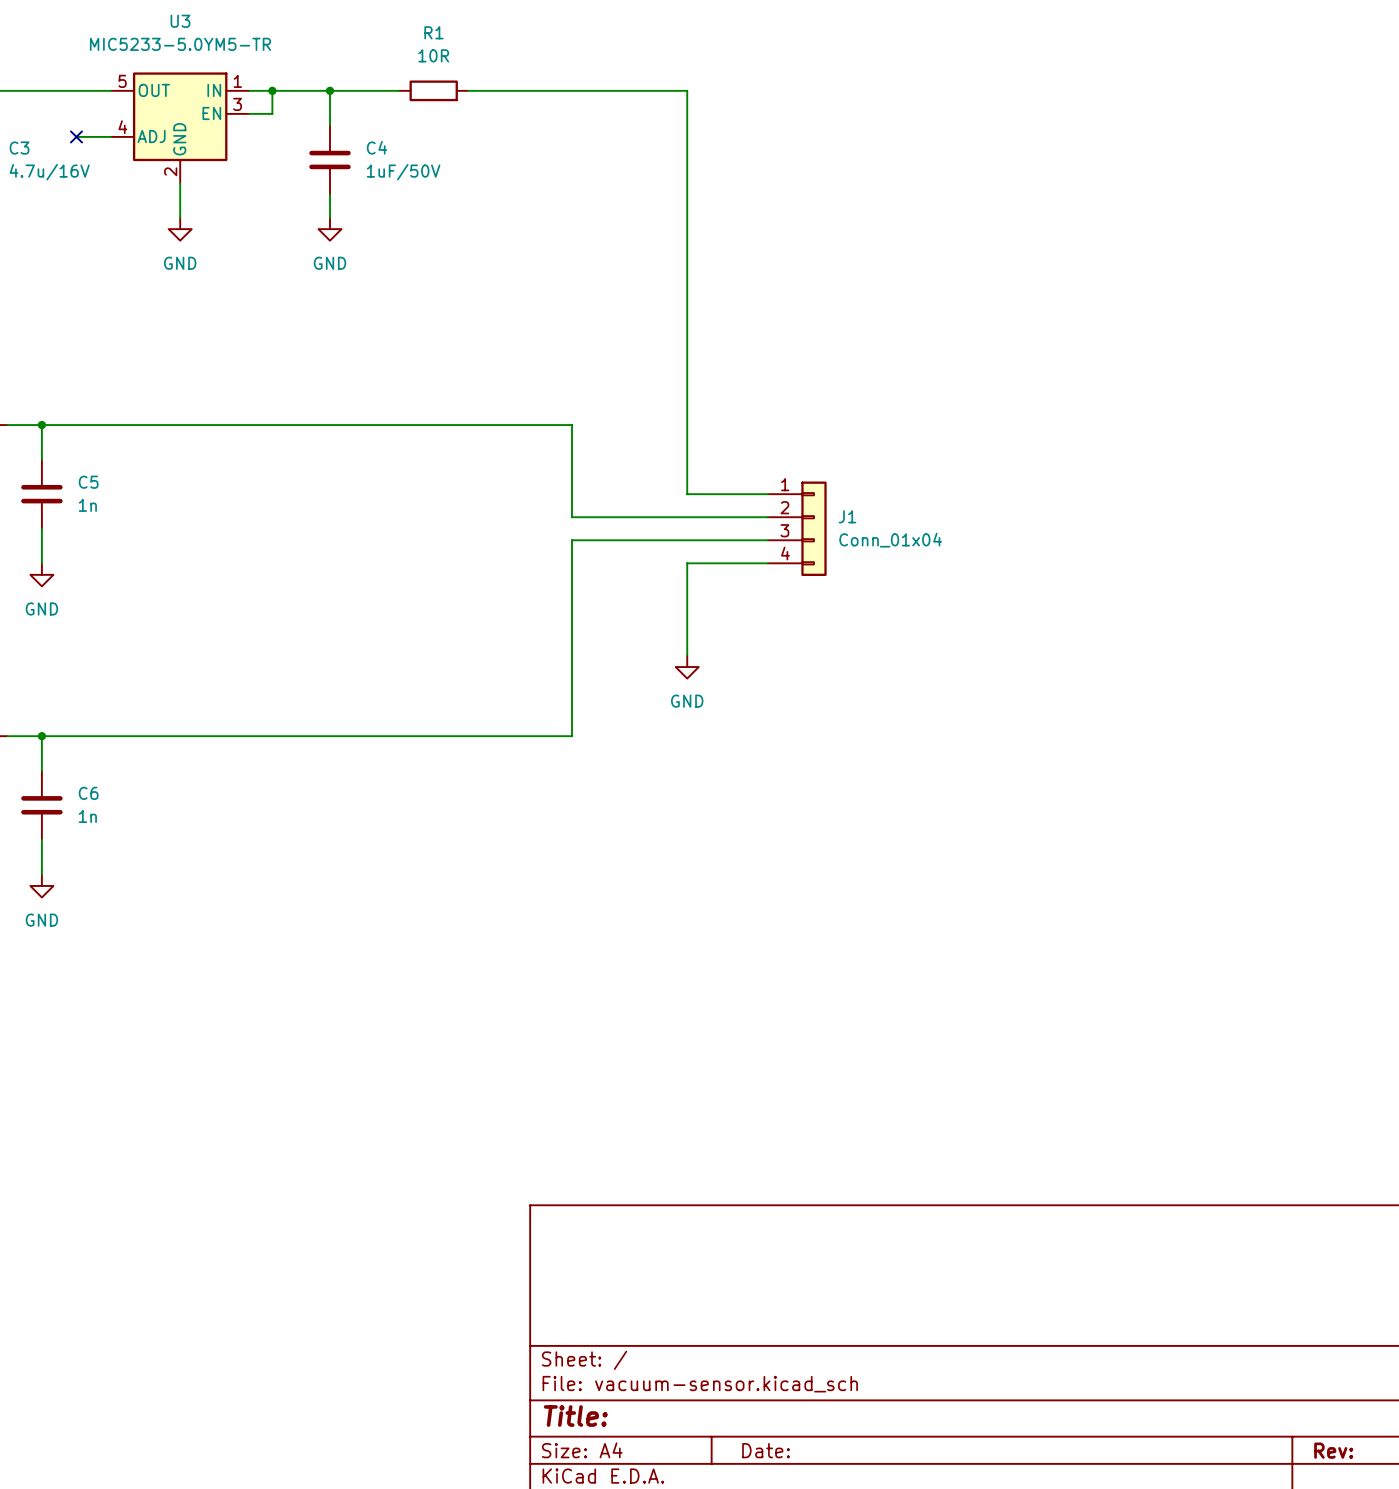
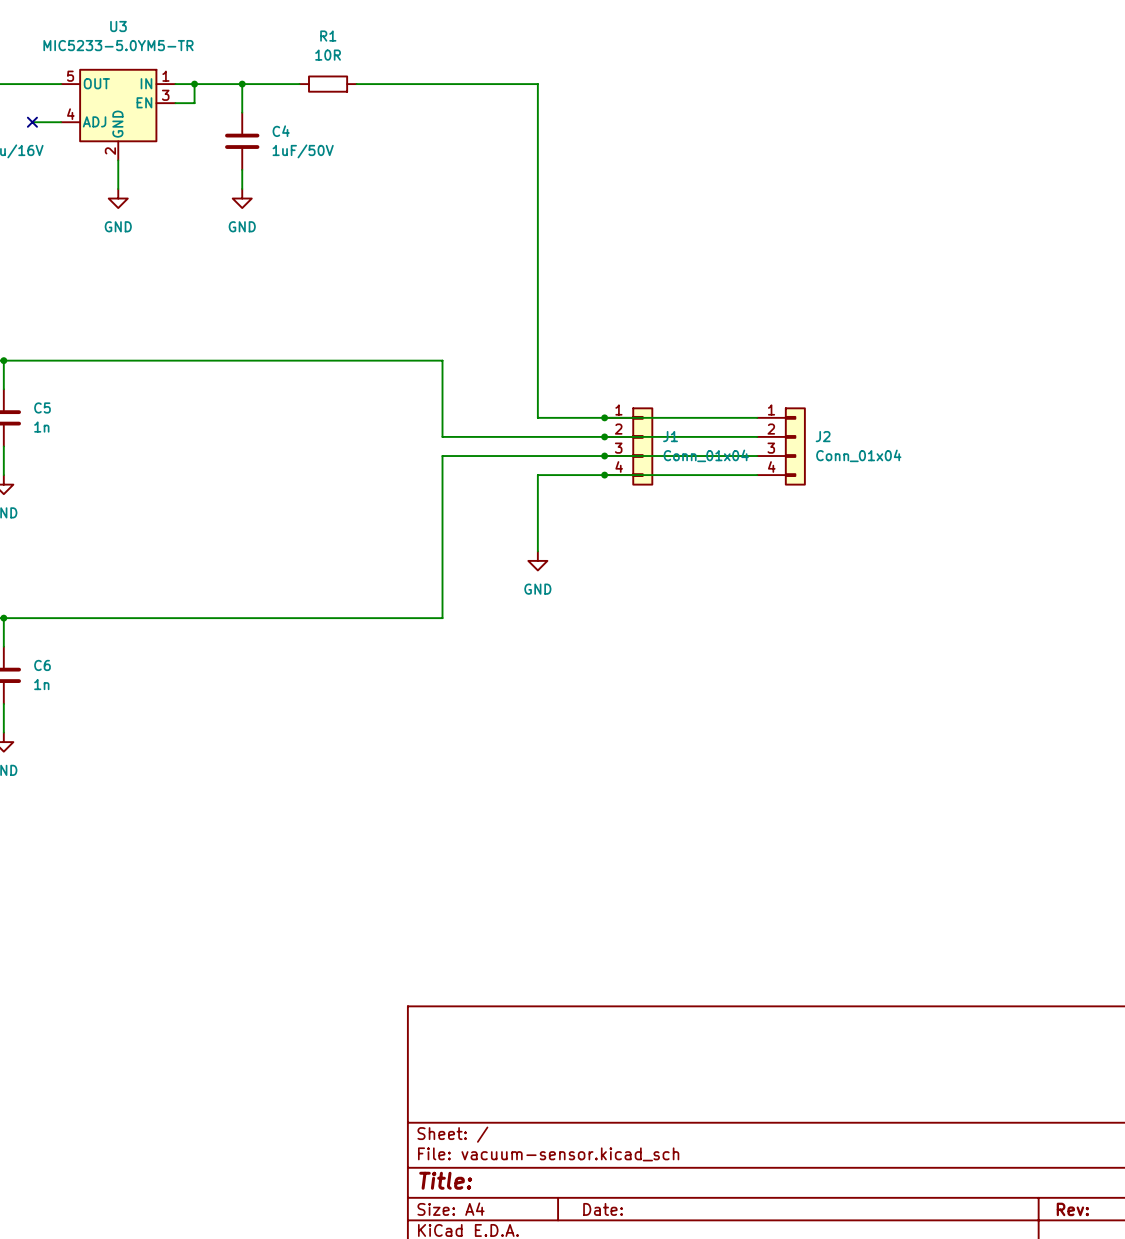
wire: none -> (604, 417) (757, 417)
junction: none -> (604, 417)
wire: none -> (604, 436) (757, 436)
junction: none -> (604, 436)
J2: none -> Conn_01x04 (781, 446)
wire: none -> (604, 456) (757, 456)
junction: none -> (604, 456)
wire: none -> (604, 475) (757, 475)
junction: none -> (604, 475)

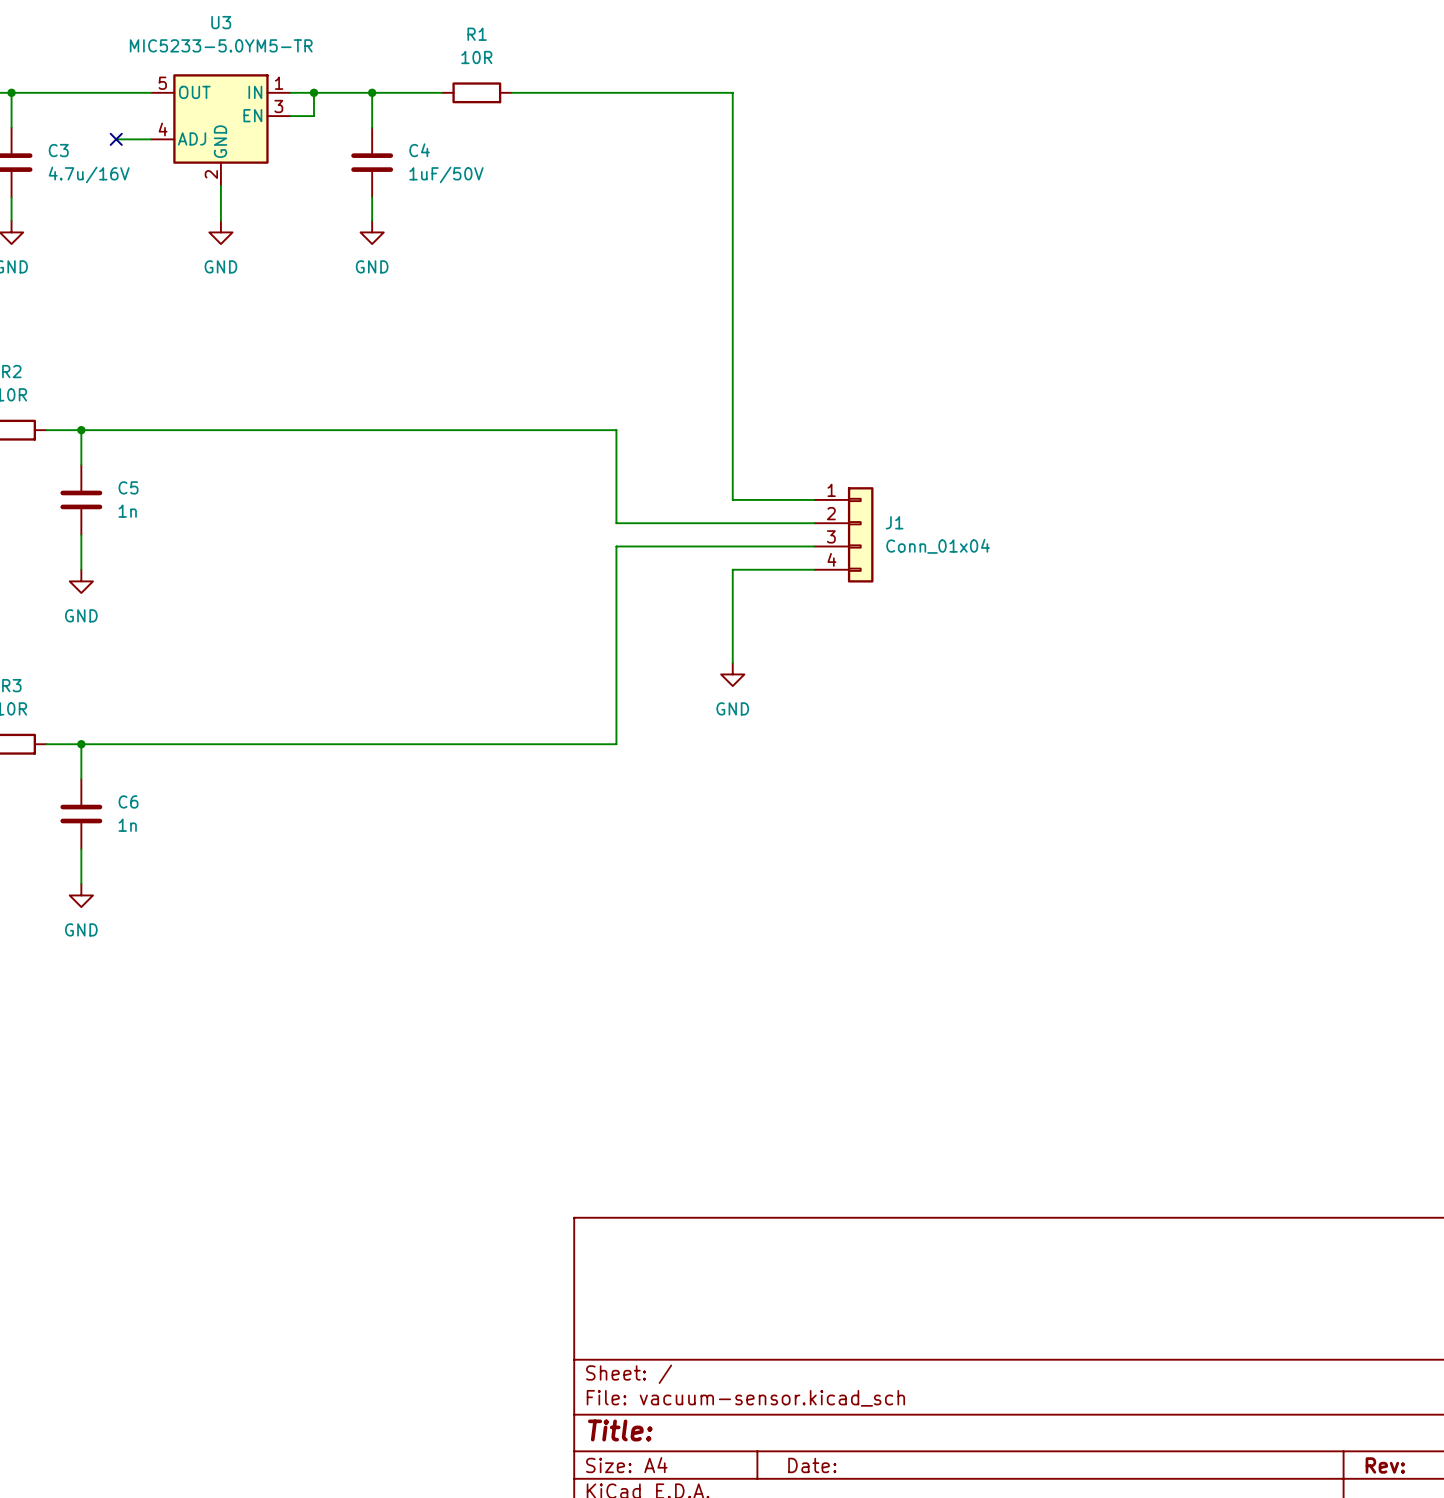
wire: (604, 417) (757, 417) -> none
junction: (604, 417) -> none
wire: (604, 436) (757, 436) -> none
junction: (604, 436) -> none
J2: Conn_01x04 (781, 446) -> none
wire: (604, 456) (757, 456) -> none
junction: (604, 456) -> none
wire: (604, 475) (757, 475) -> none
junction: (604, 475) -> none

